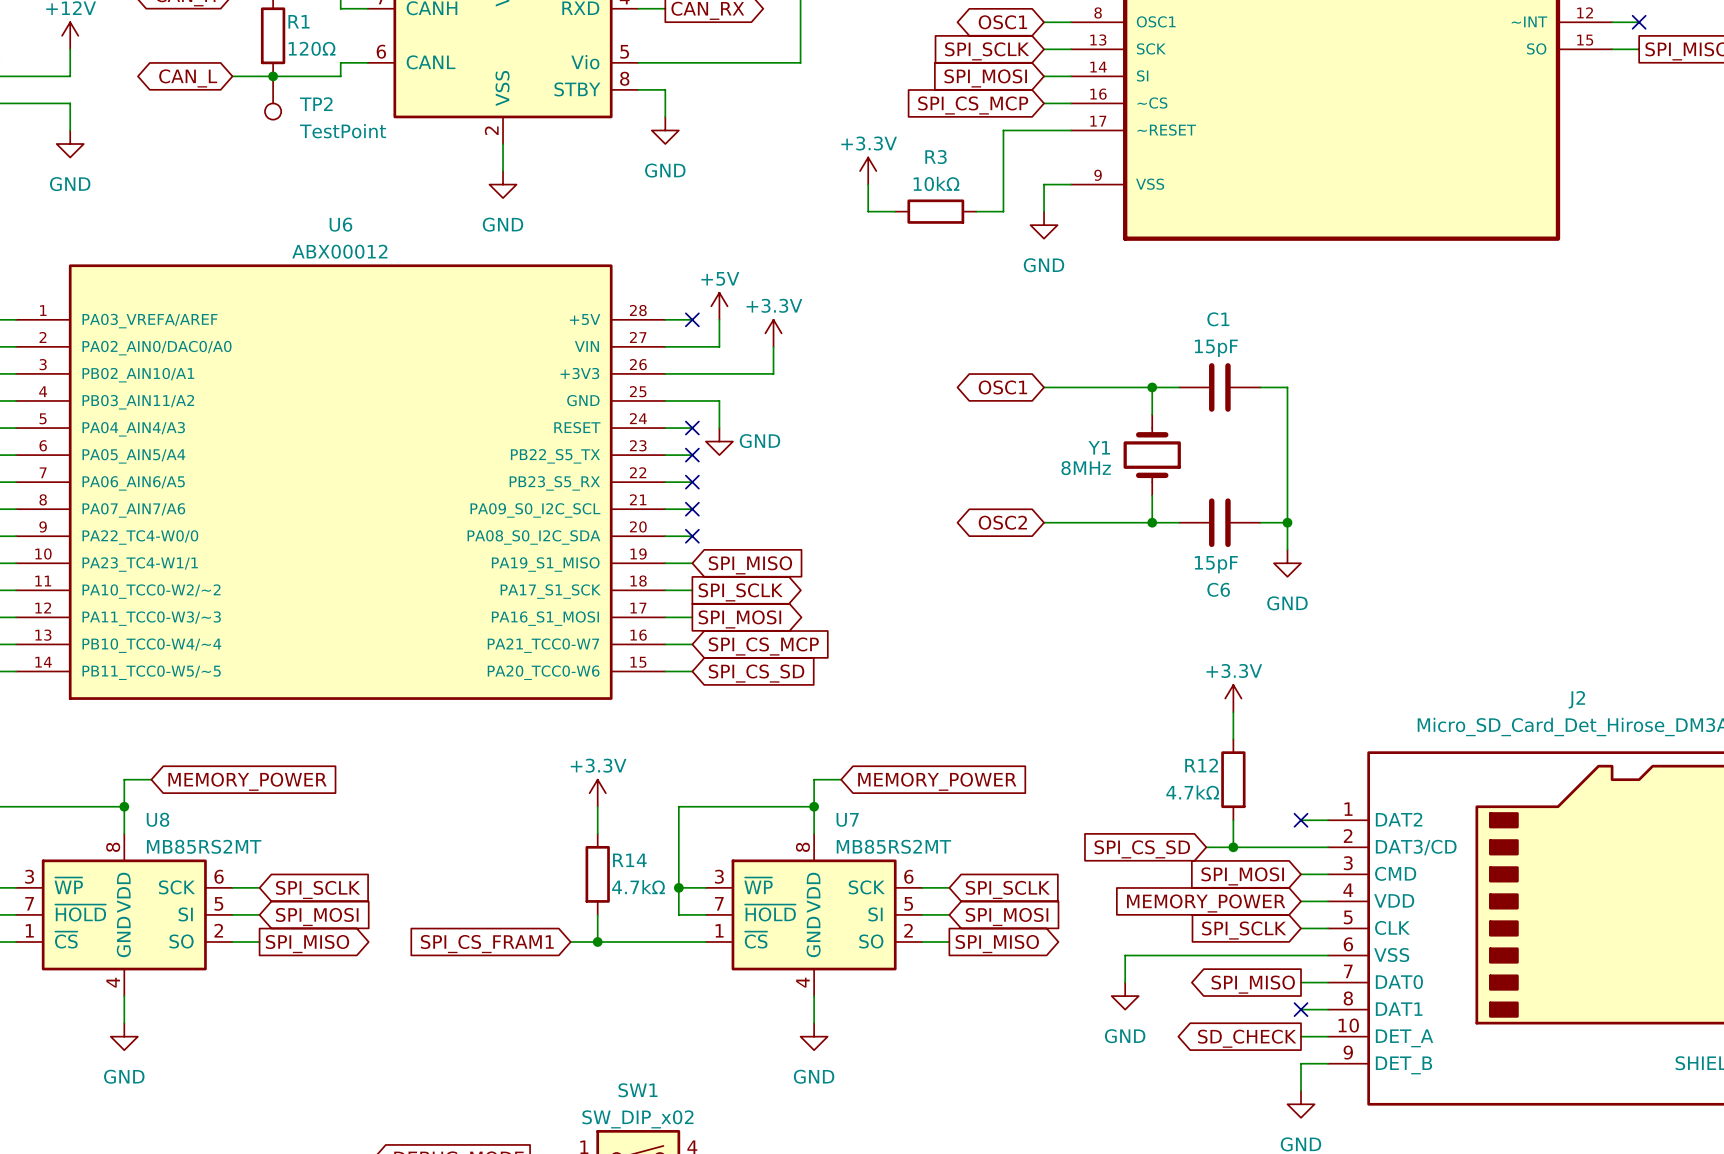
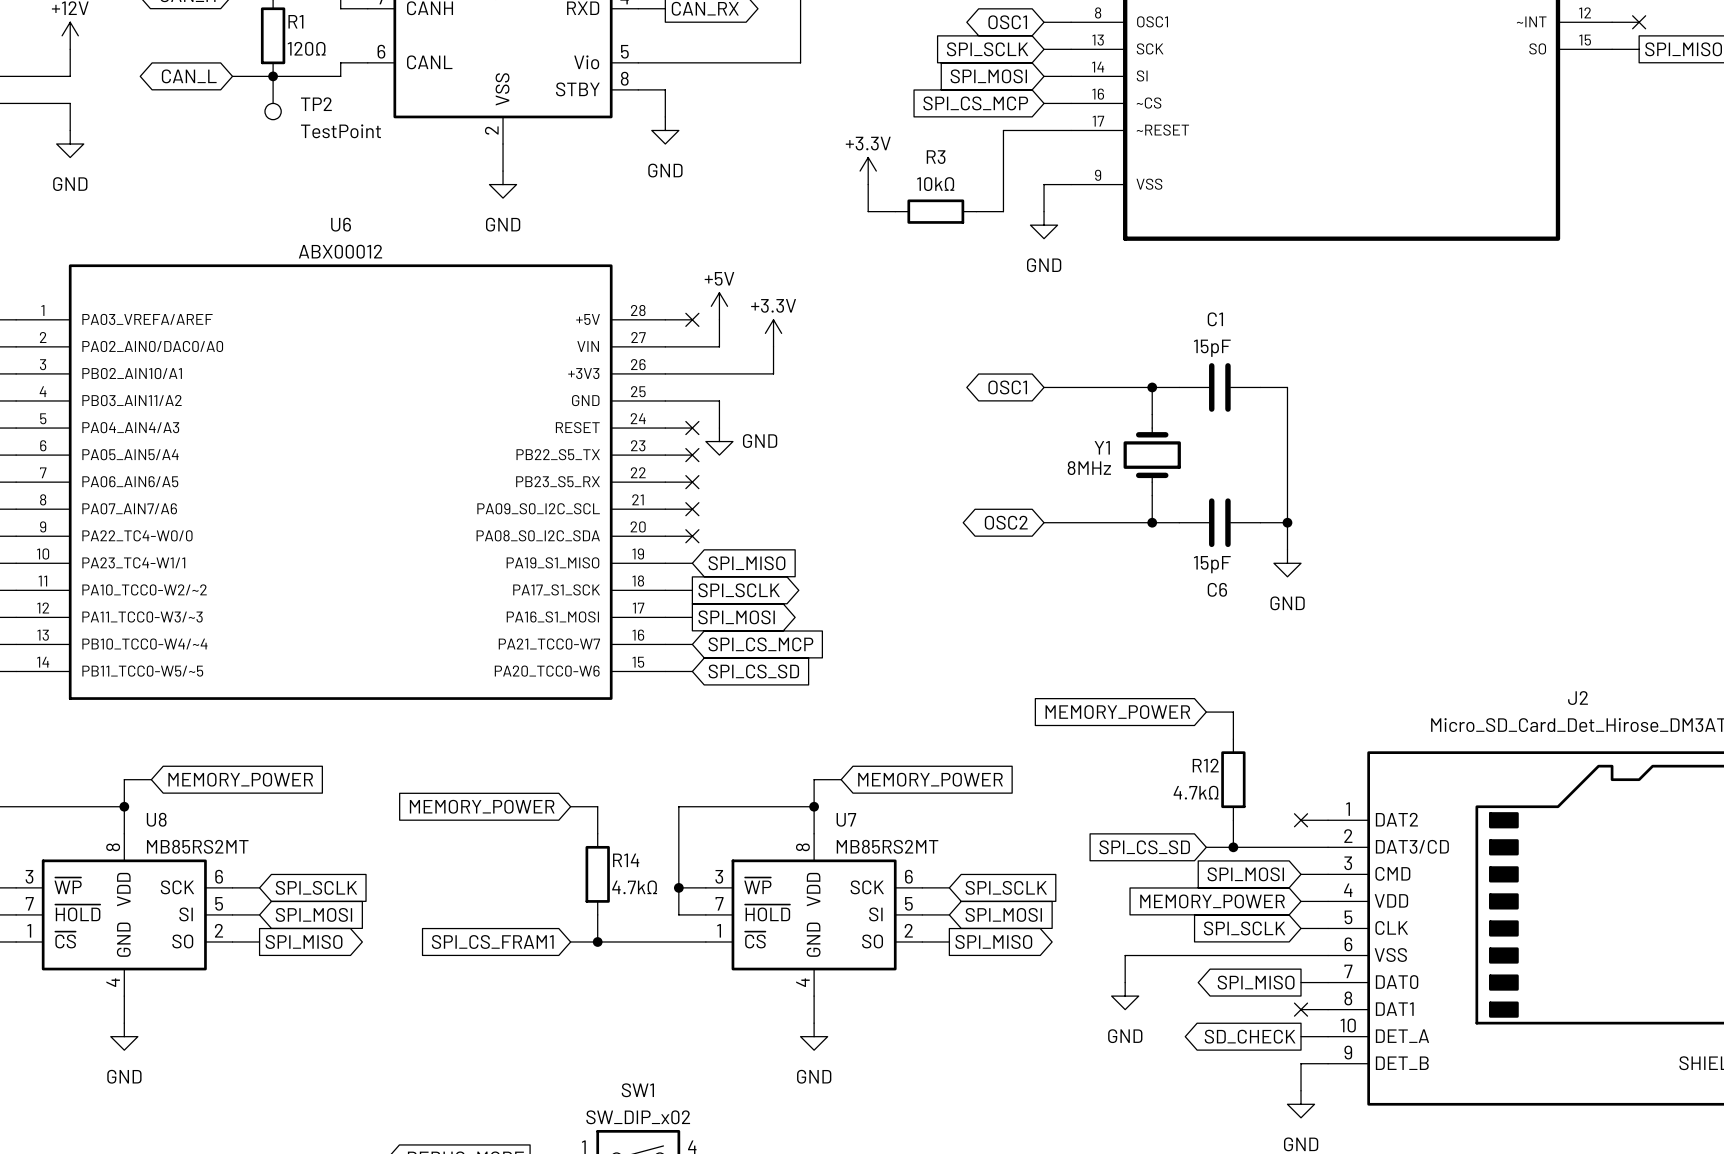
power symbol: +3.3V (1233, 698) -> none
wire: none -> (1206, 712) (1233, 712)
global label: none -> MEMORY_POWER (1117, 712)
power symbol: +3.3V (597, 793) -> none
wire: none -> (570, 806) (597, 806)
global label: none -> MEMORY_POWER (482, 806)

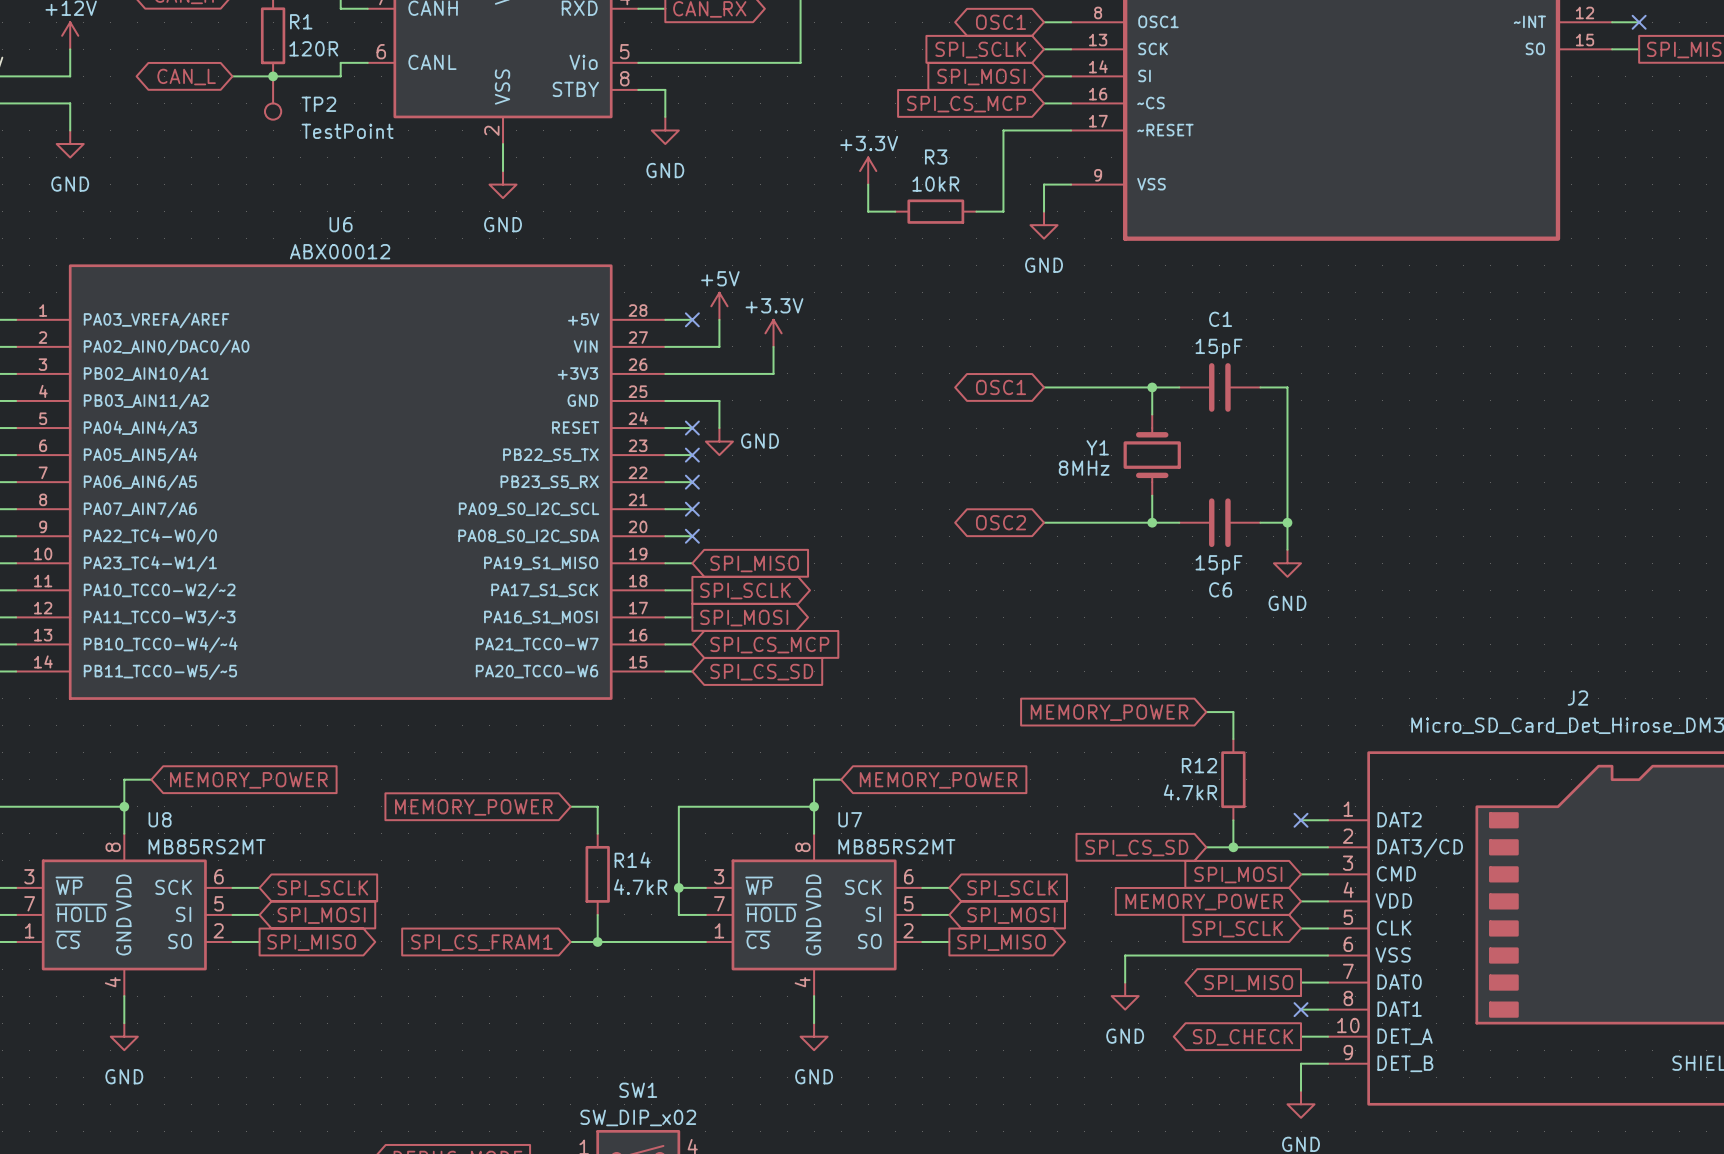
R1 value: 120Ω (306, 48) -> 120R (313, 48)
R3 value: 10kΩ (935, 184) -> 10kR (935, 184)
R12 value: 4.7kΩ (1196, 792) -> 4.7kR (1190, 792)
R14 value: 4.7kΩ (634, 887) -> 4.7kR (640, 887)

